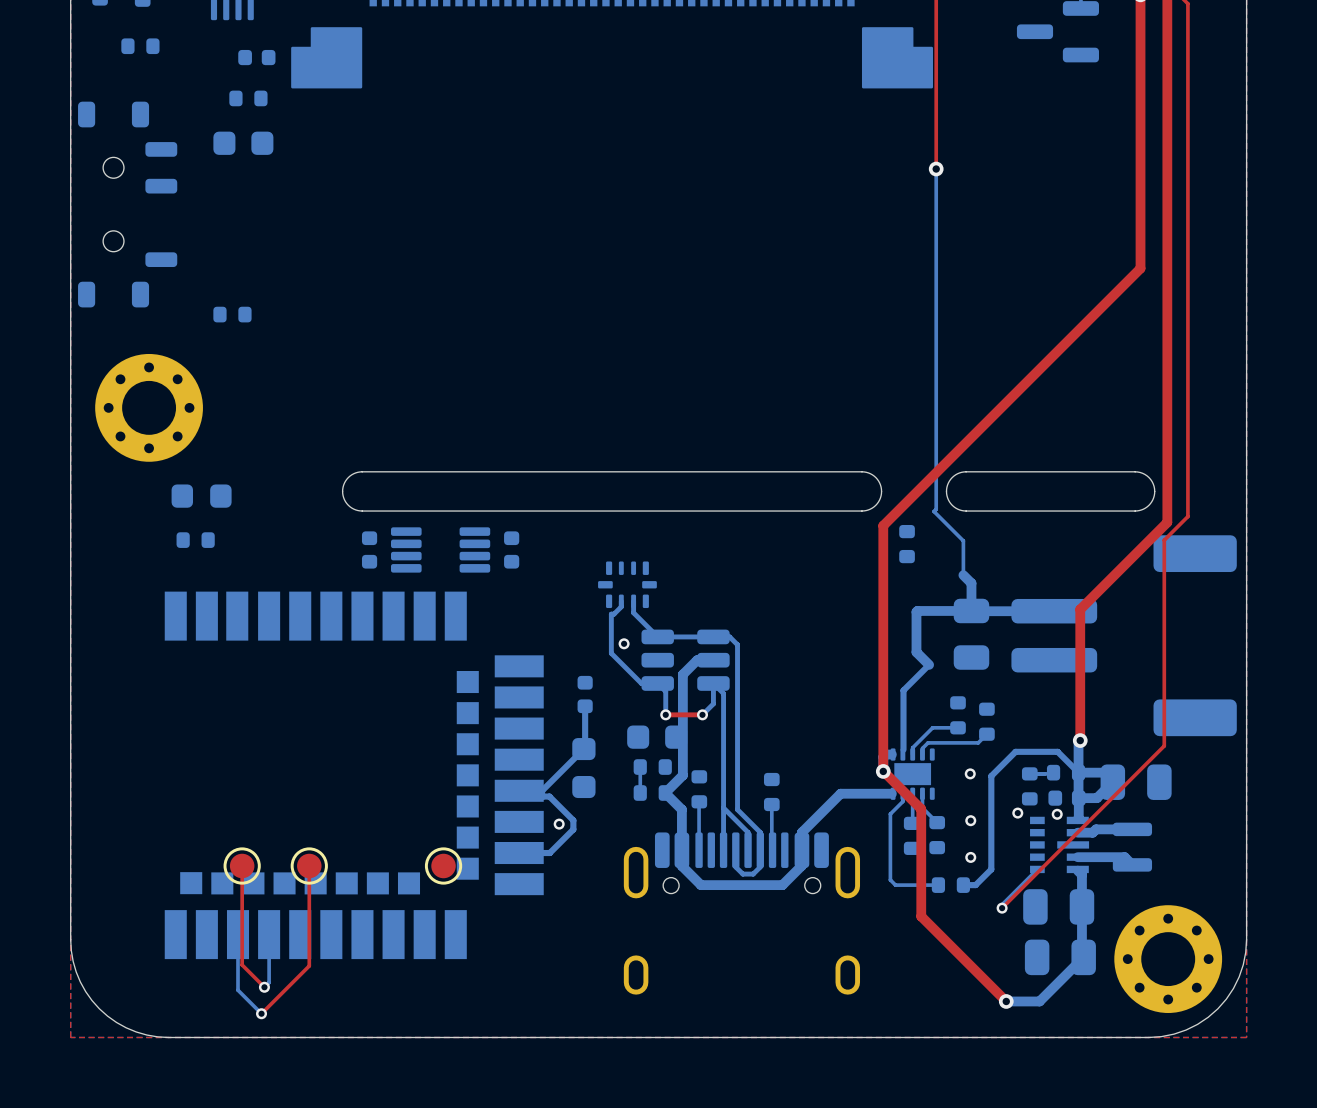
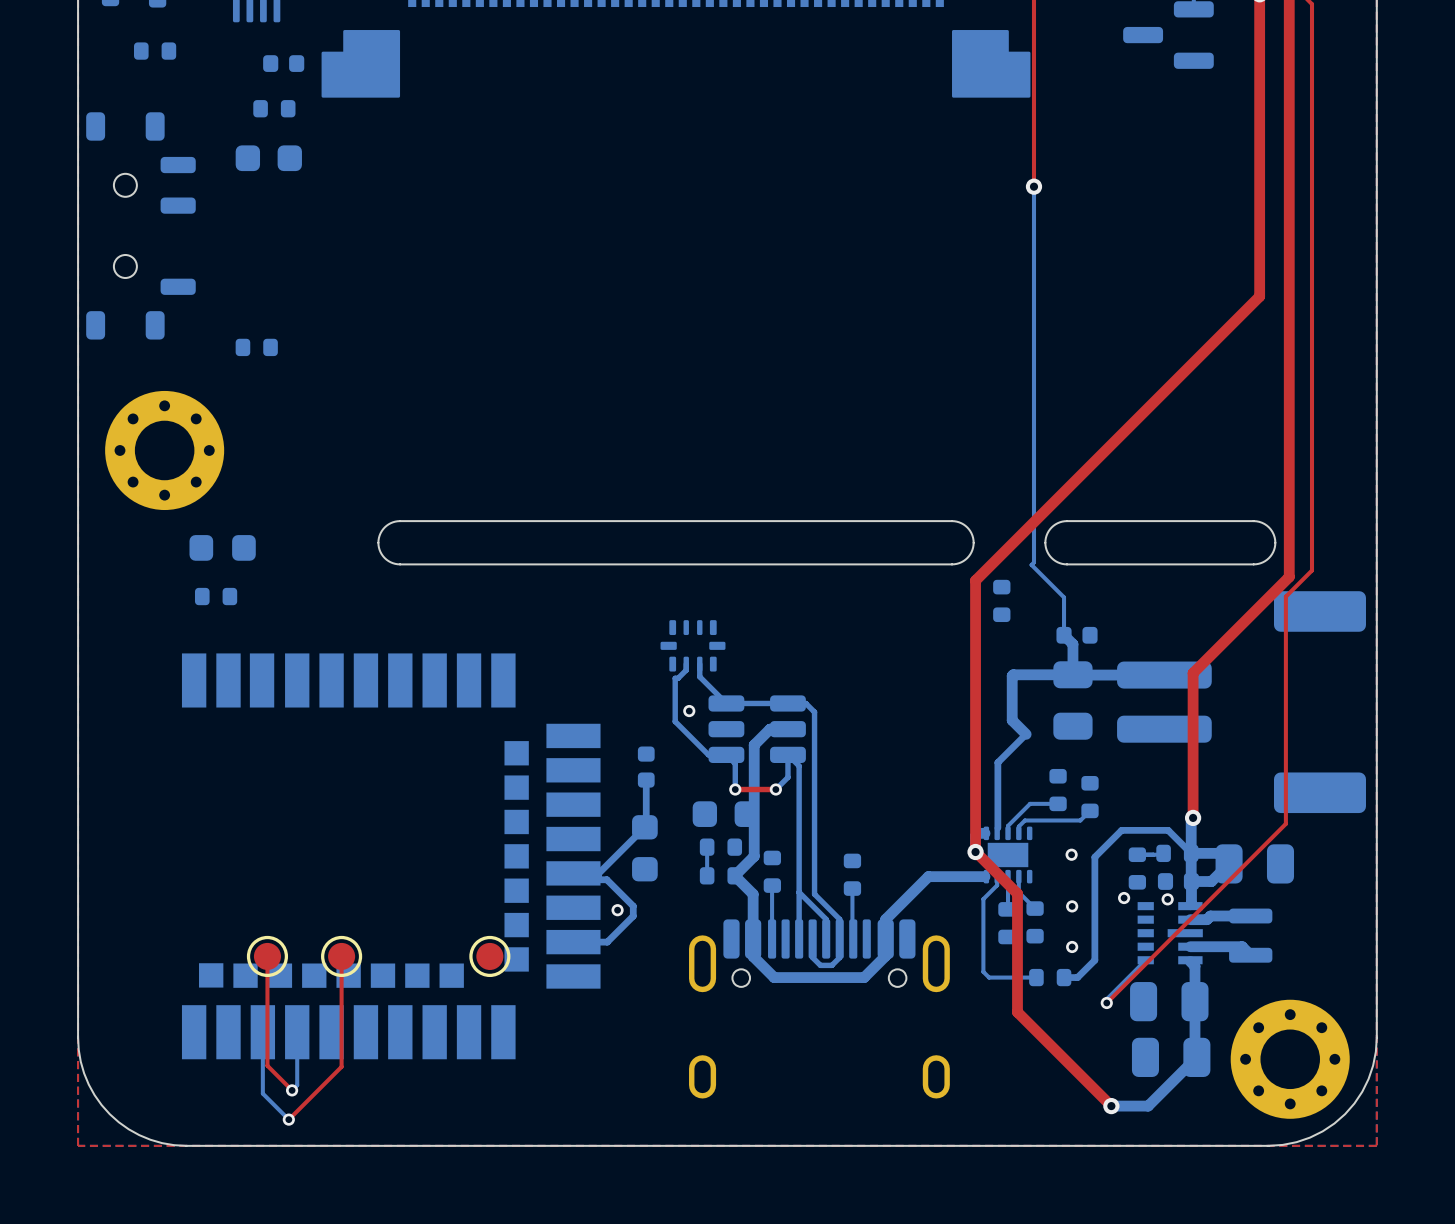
part: (369, 549) -> none
part: (440, 549) -> none
part: (511, 549) -> none
part: none -> (1077, 635)

